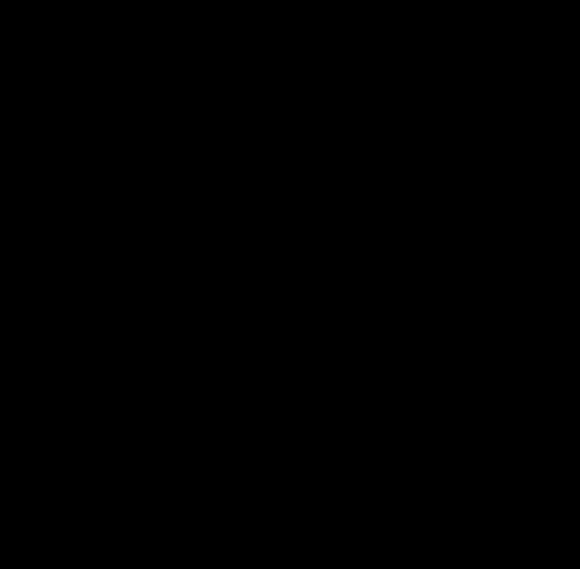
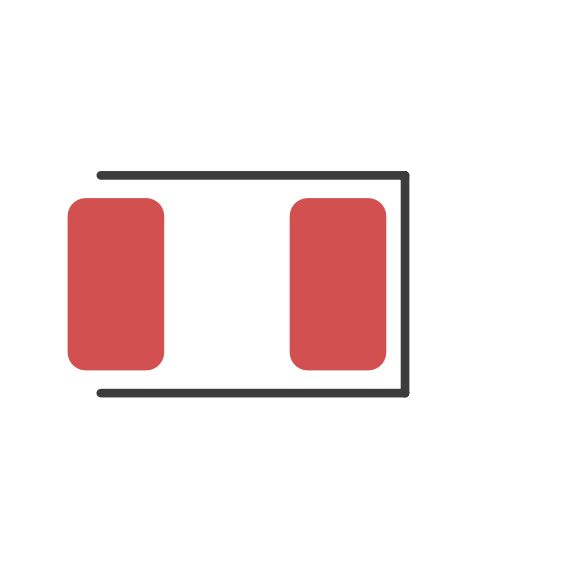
part: none -> (238, 284)

